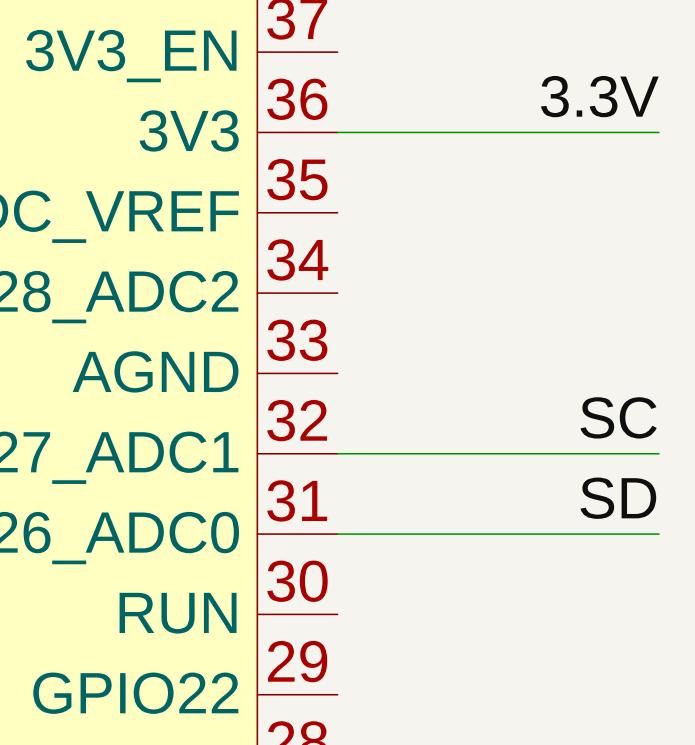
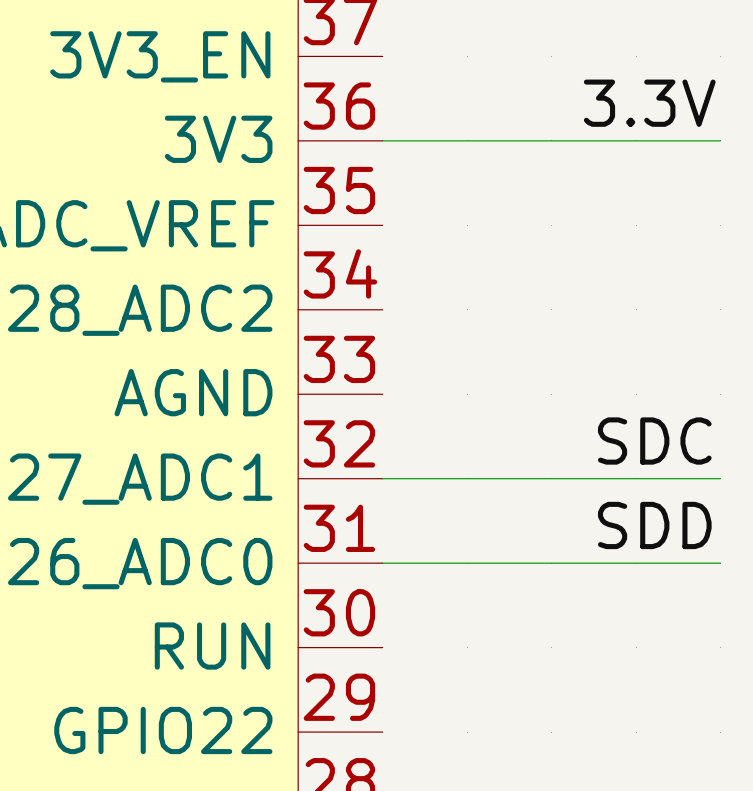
label: SC (618, 417) -> SDC (654, 441)
label: SD (618, 498) -> SDD (654, 525)

